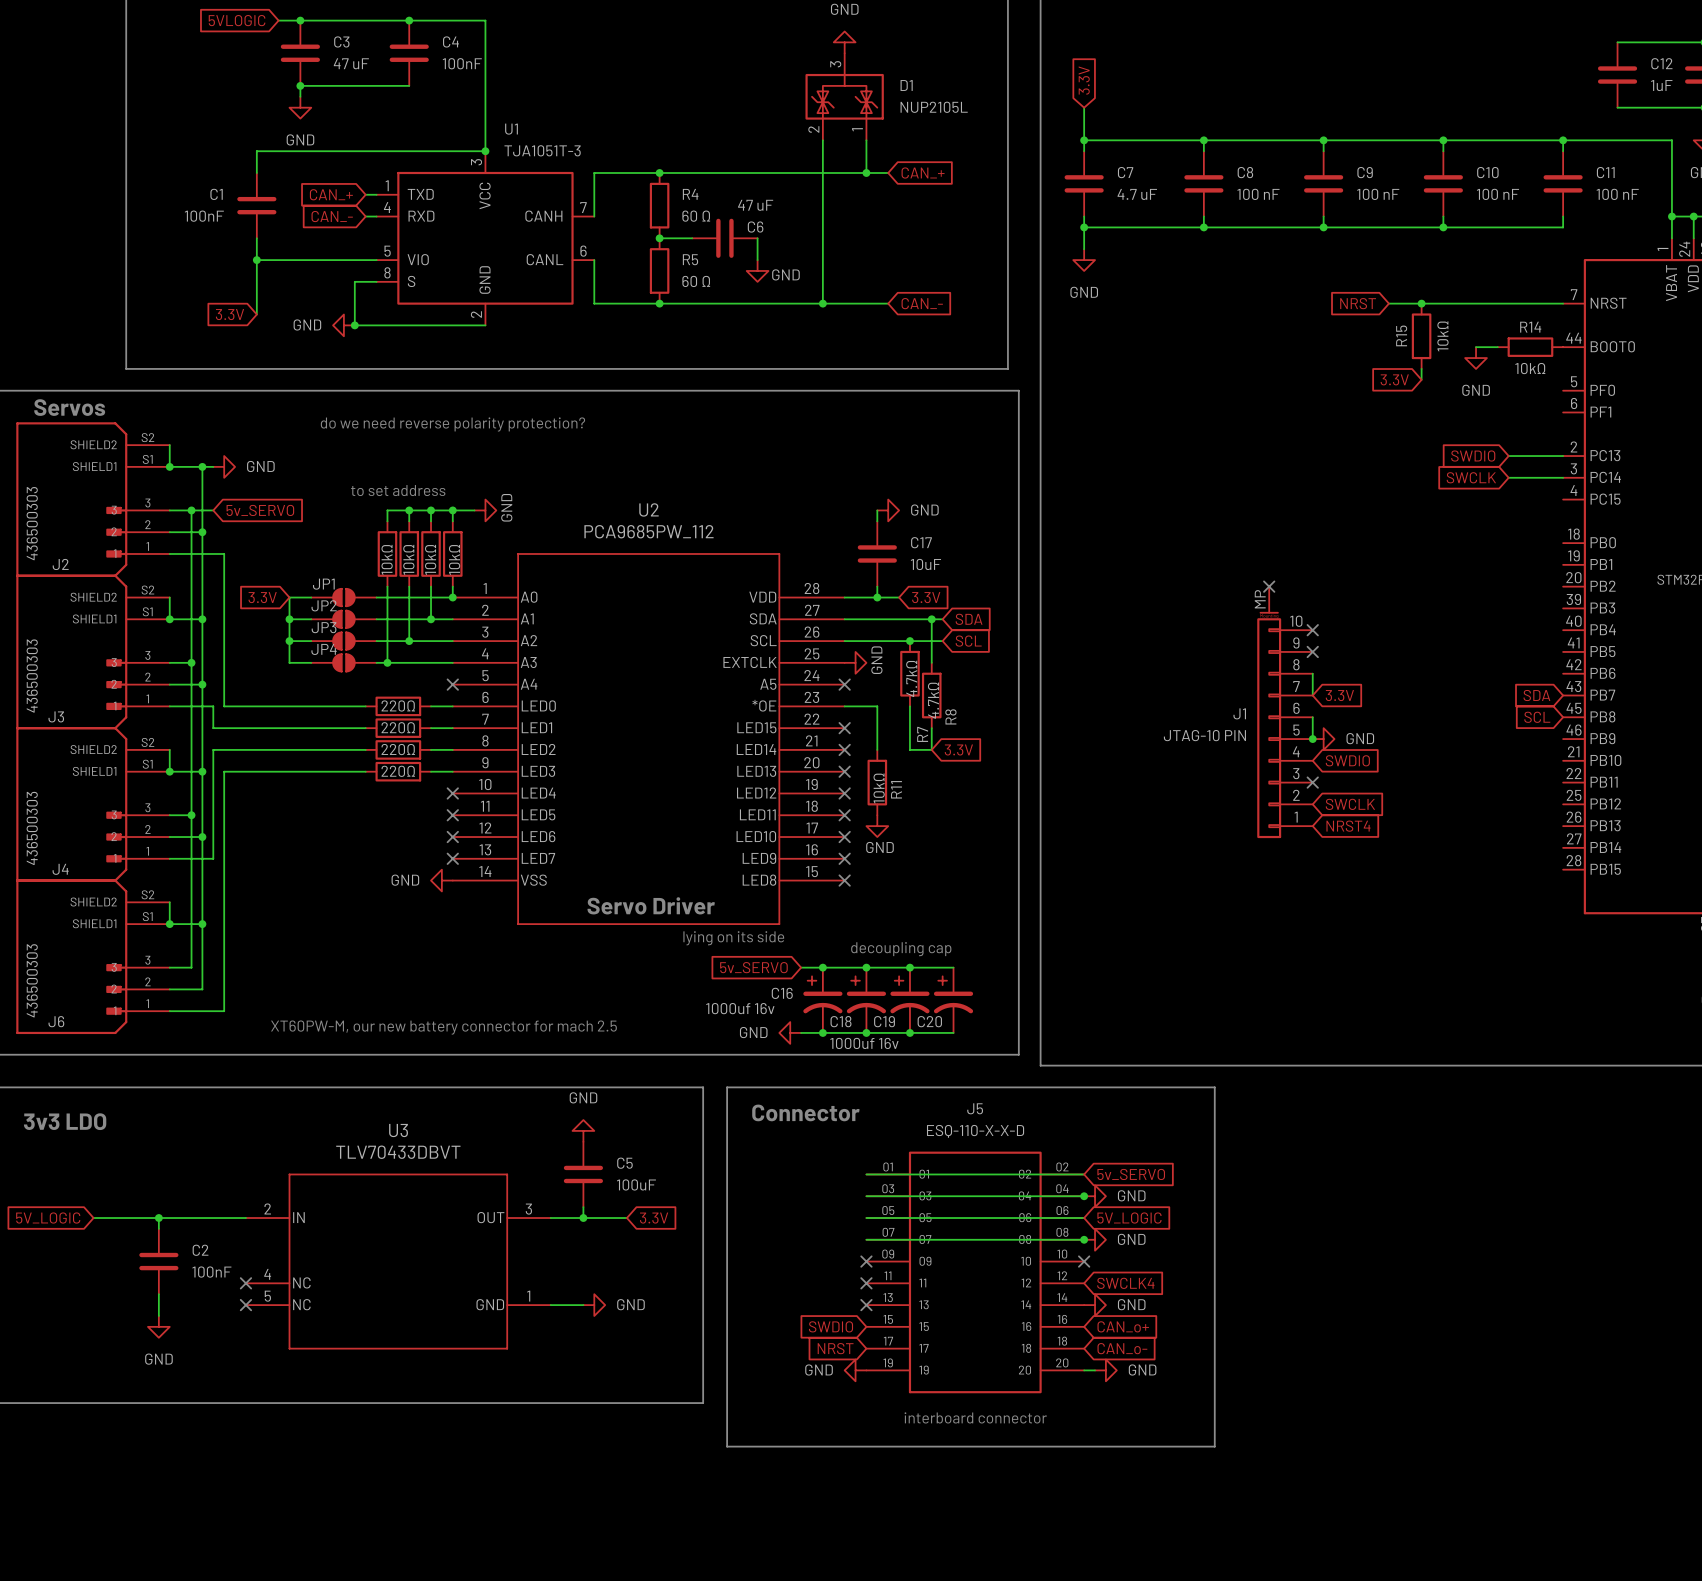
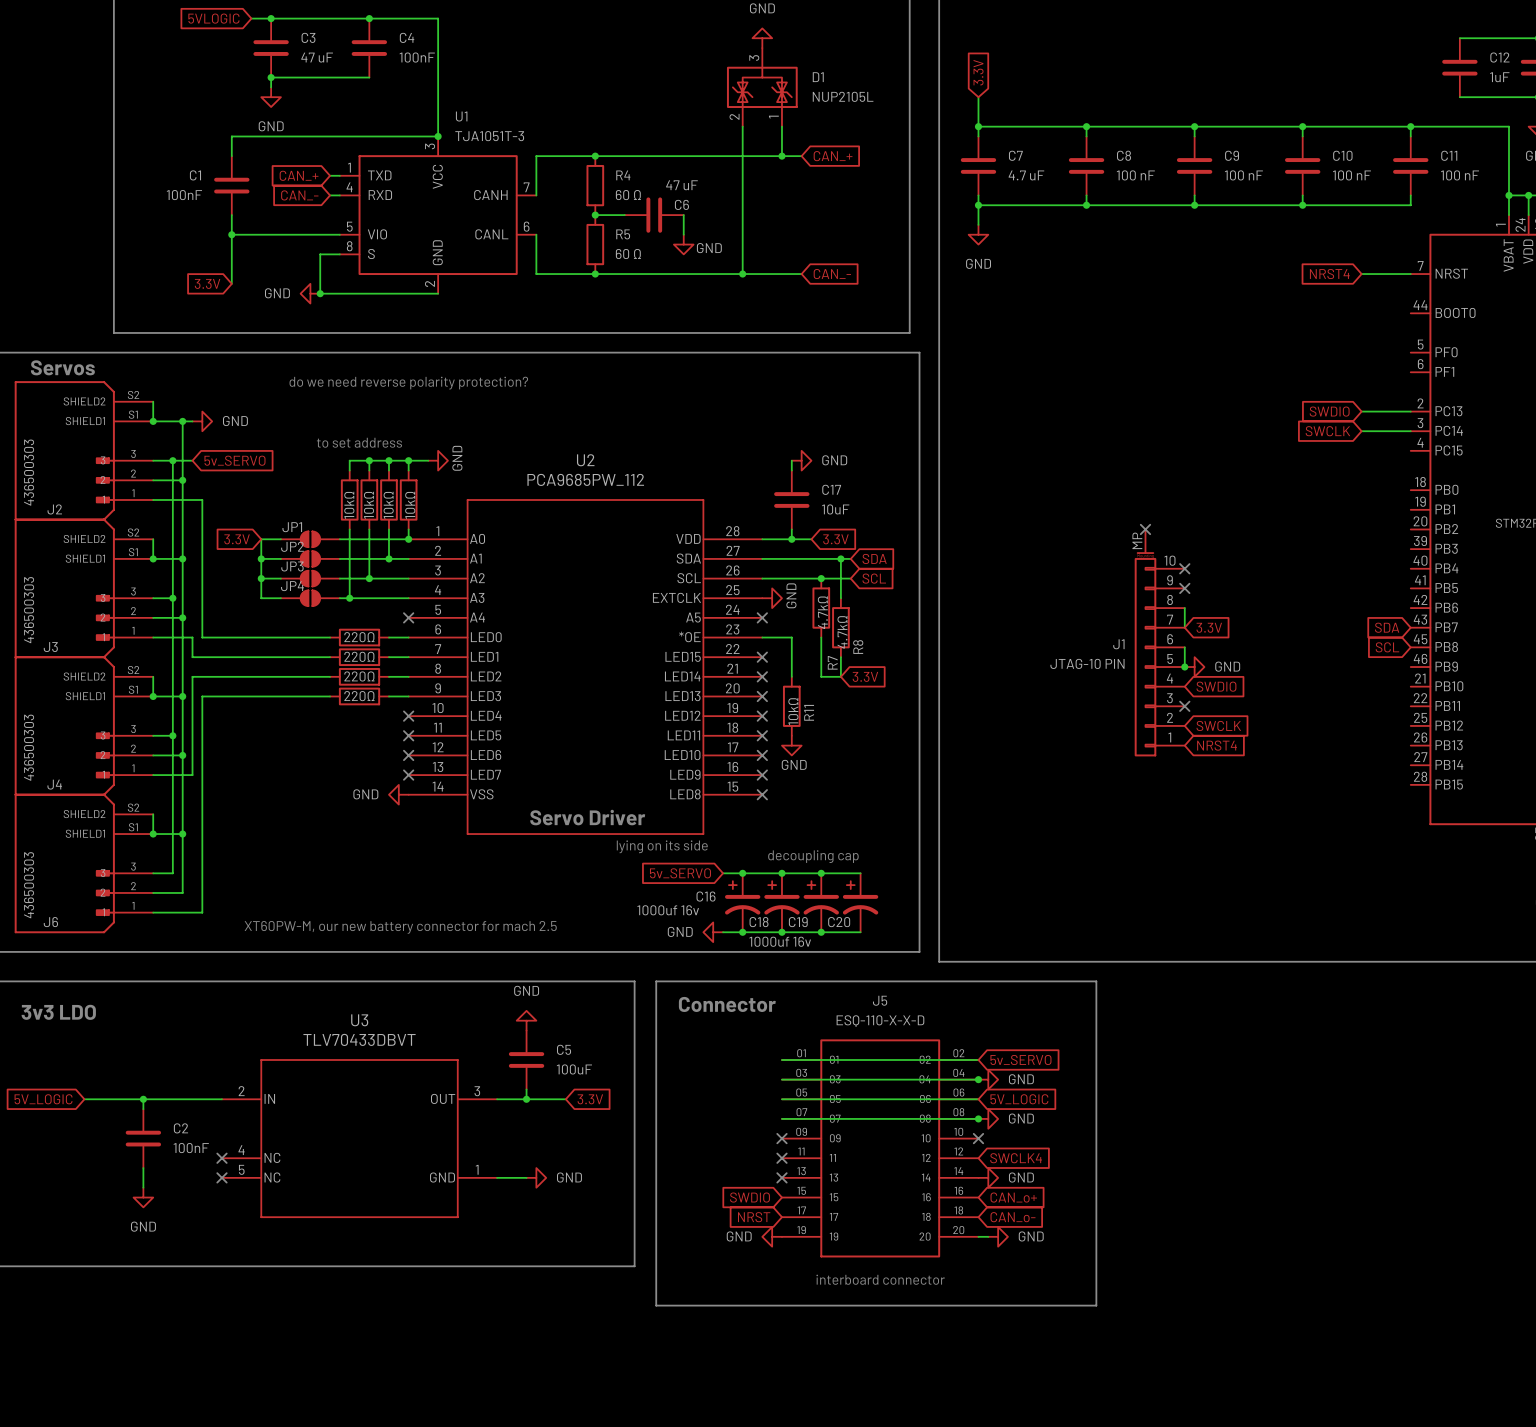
global label: NRST (1358, 303) -> none
wire: (1388, 303) (1508, 303) -> none
junction: (1421, 303) -> none
global label: none -> NRST4 (1329, 274)
R15: 10kΩ (1421, 336) -> none
wire: (1476, 347) (1497, 347) -> none
R14: 10kΩ (1530, 347) -> none
power symbol: GND (1476, 358) -> none
wire: (1421, 368) (1421, 379) -> none
global label: 3.3V (1394, 379) -> none

